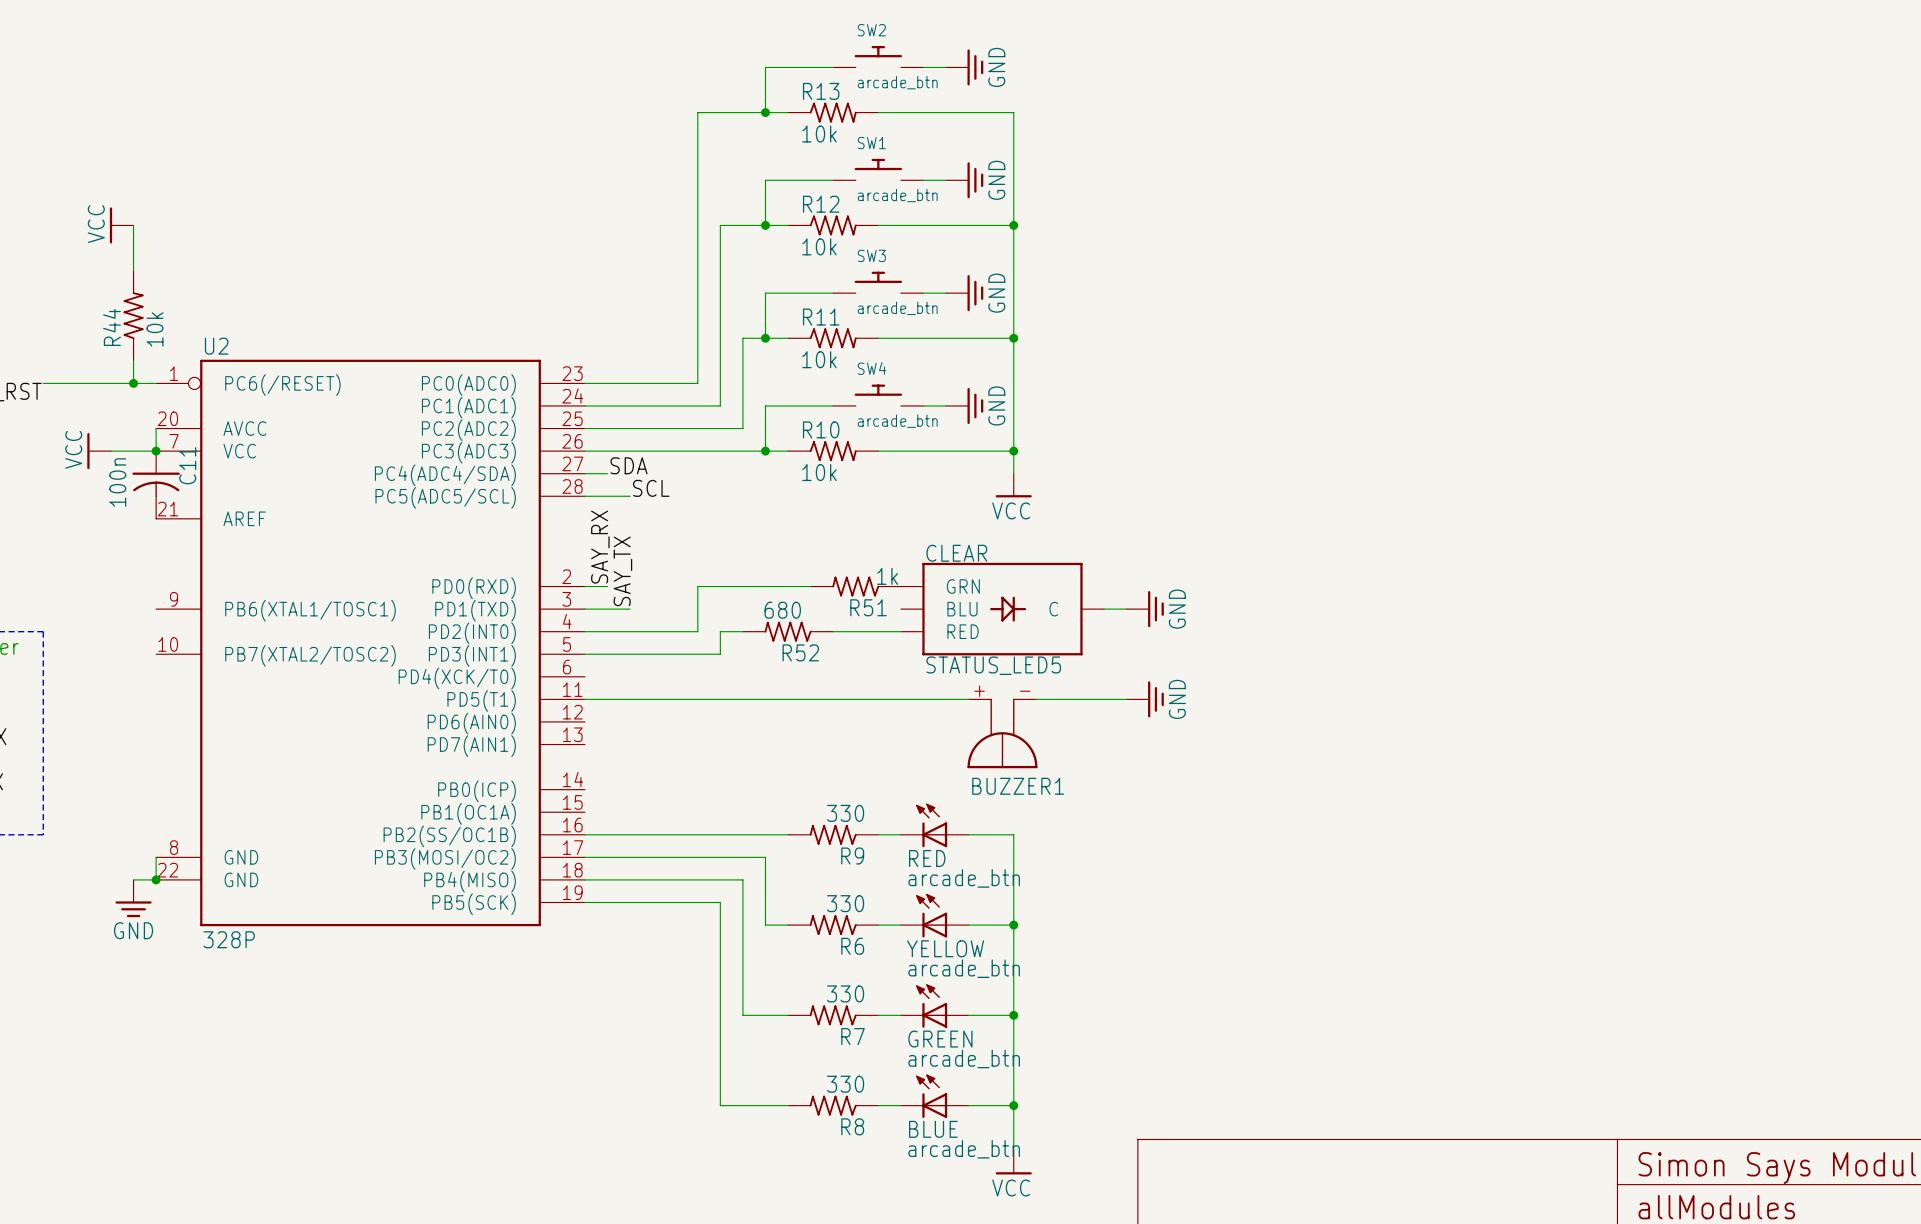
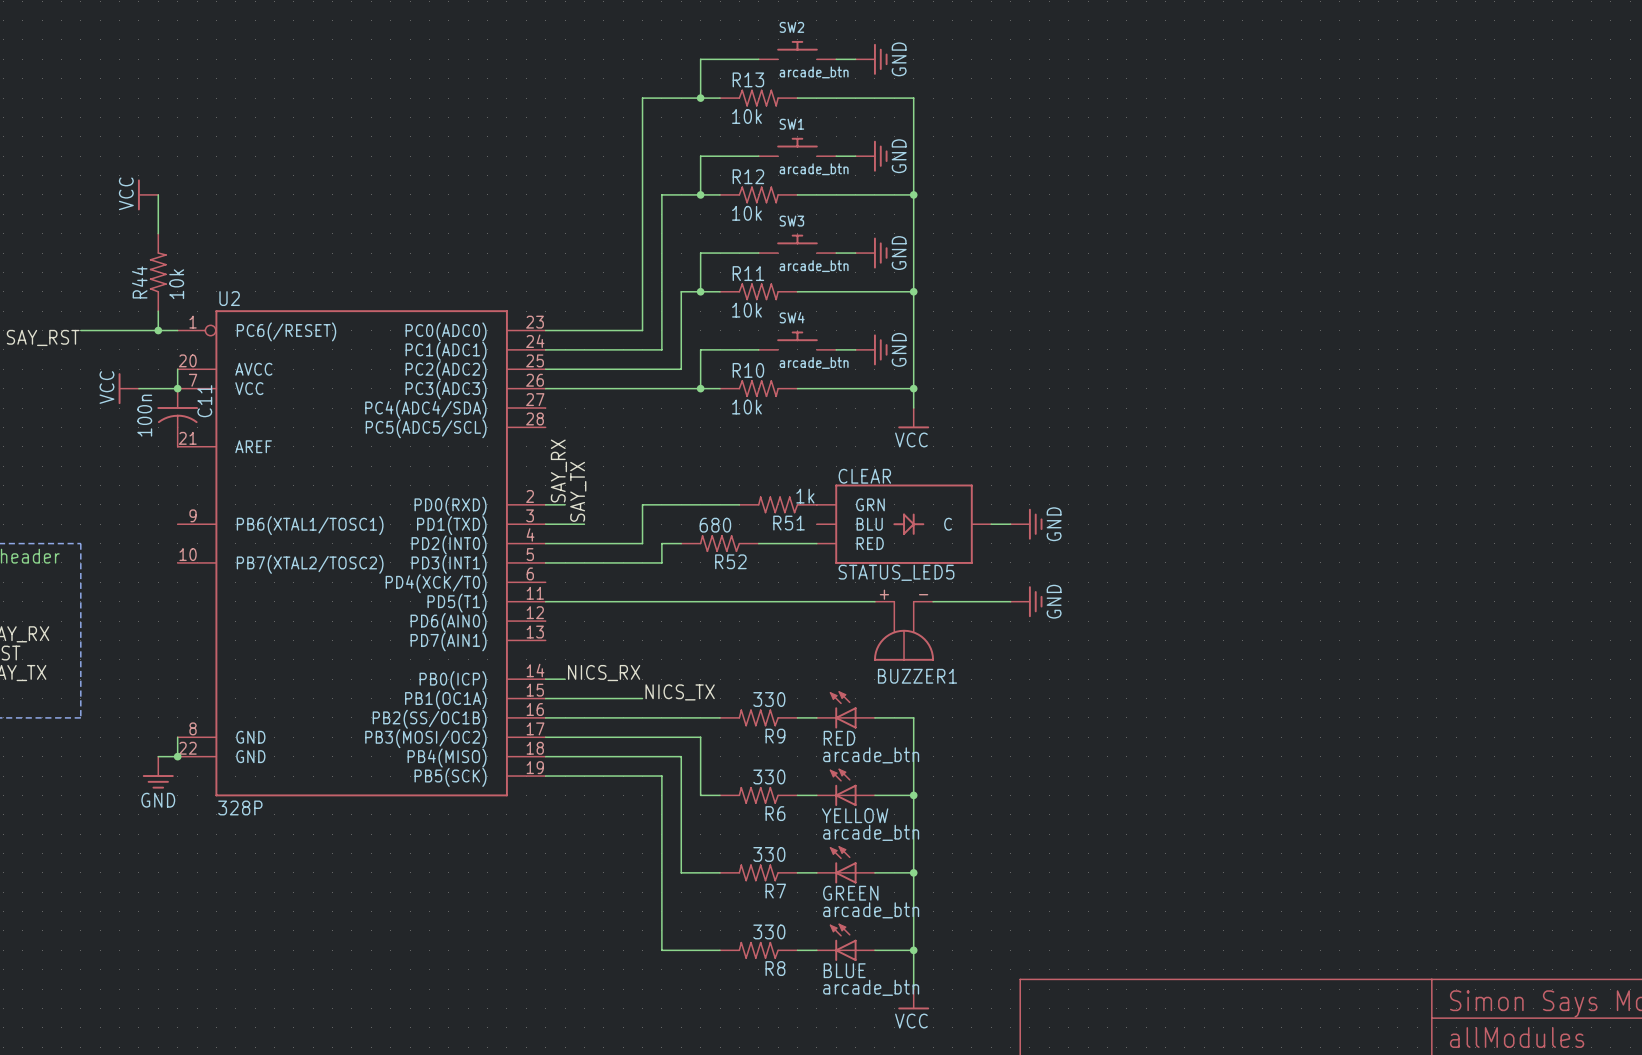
label: SDA (628, 465) -> none
wire: (584, 473) (607, 473) -> none
label: SCL (651, 488) -> none
wire: (584, 496) (630, 496) -> none
label: none -> NICS_RX (604, 673)
wire: none -> (545, 679) (565, 679)
label: none -> NICS_TX (680, 692)
wire: none -> (545, 698) (642, 698)

